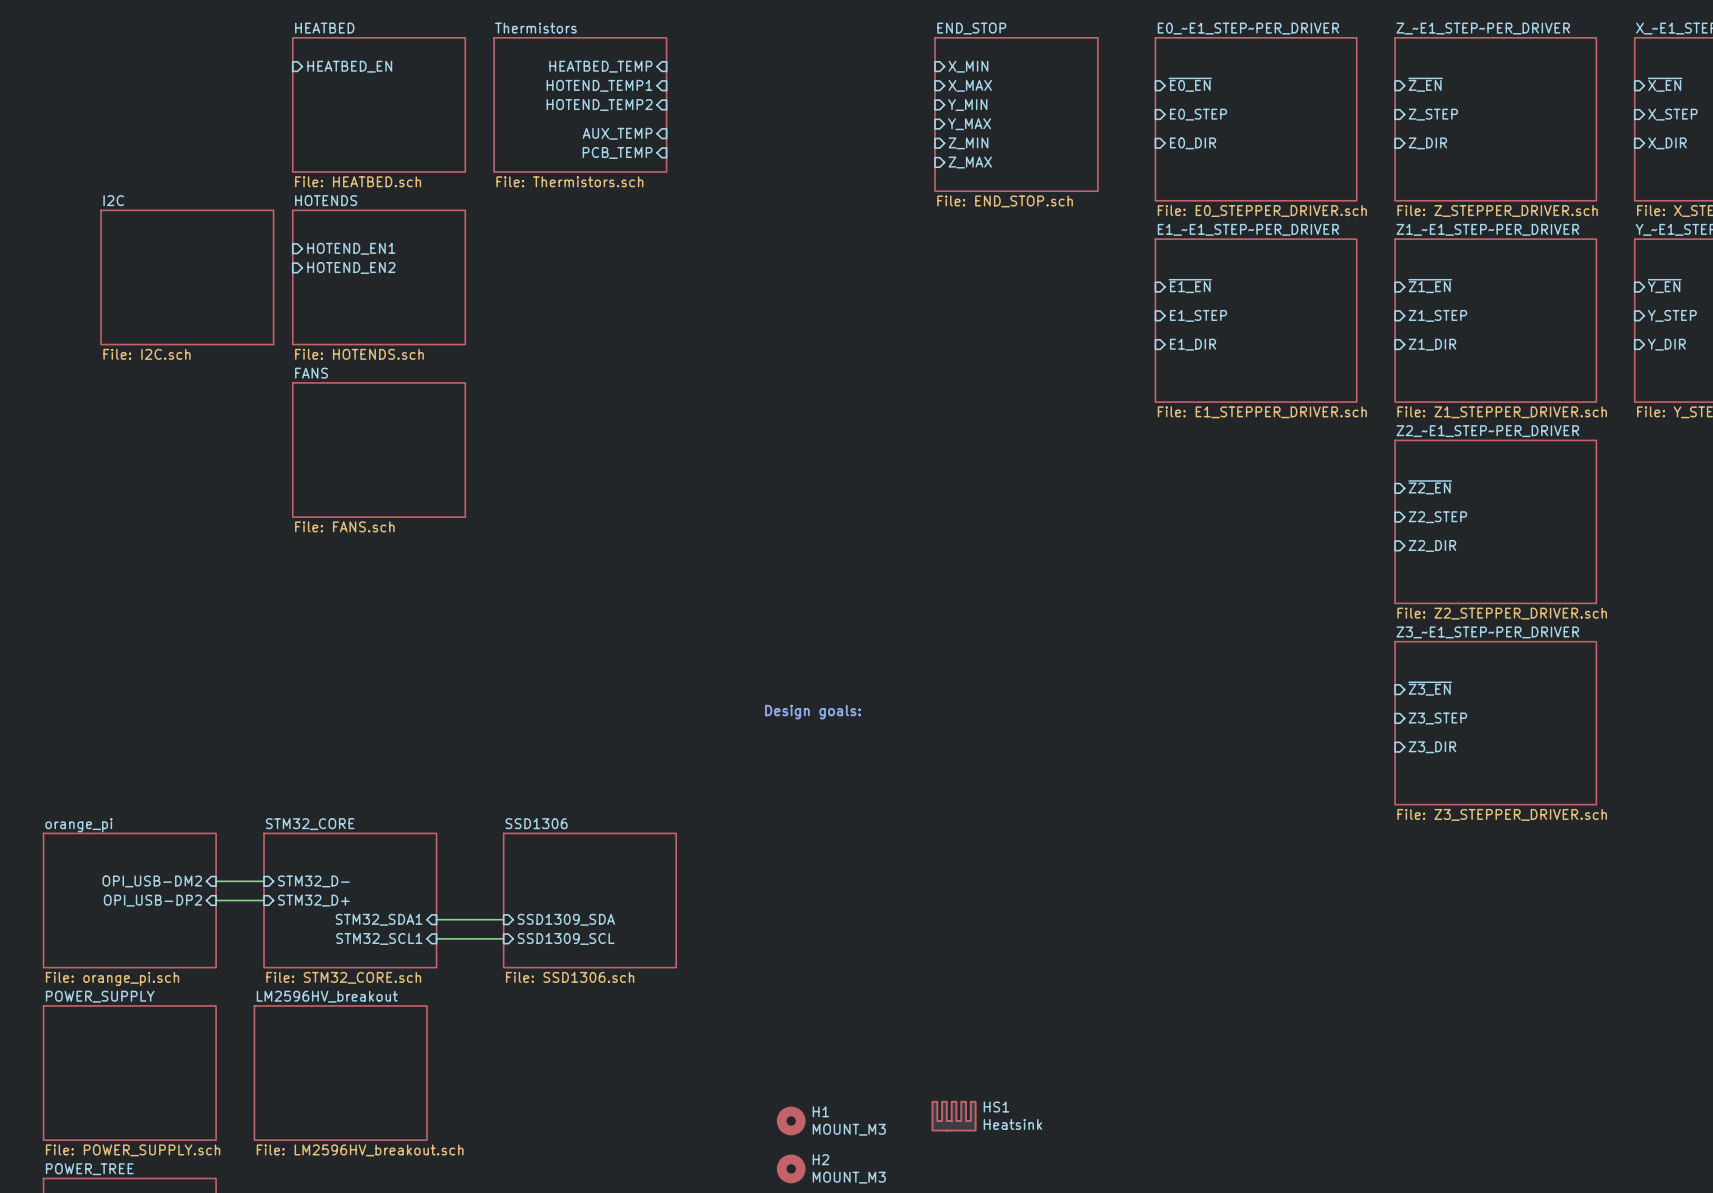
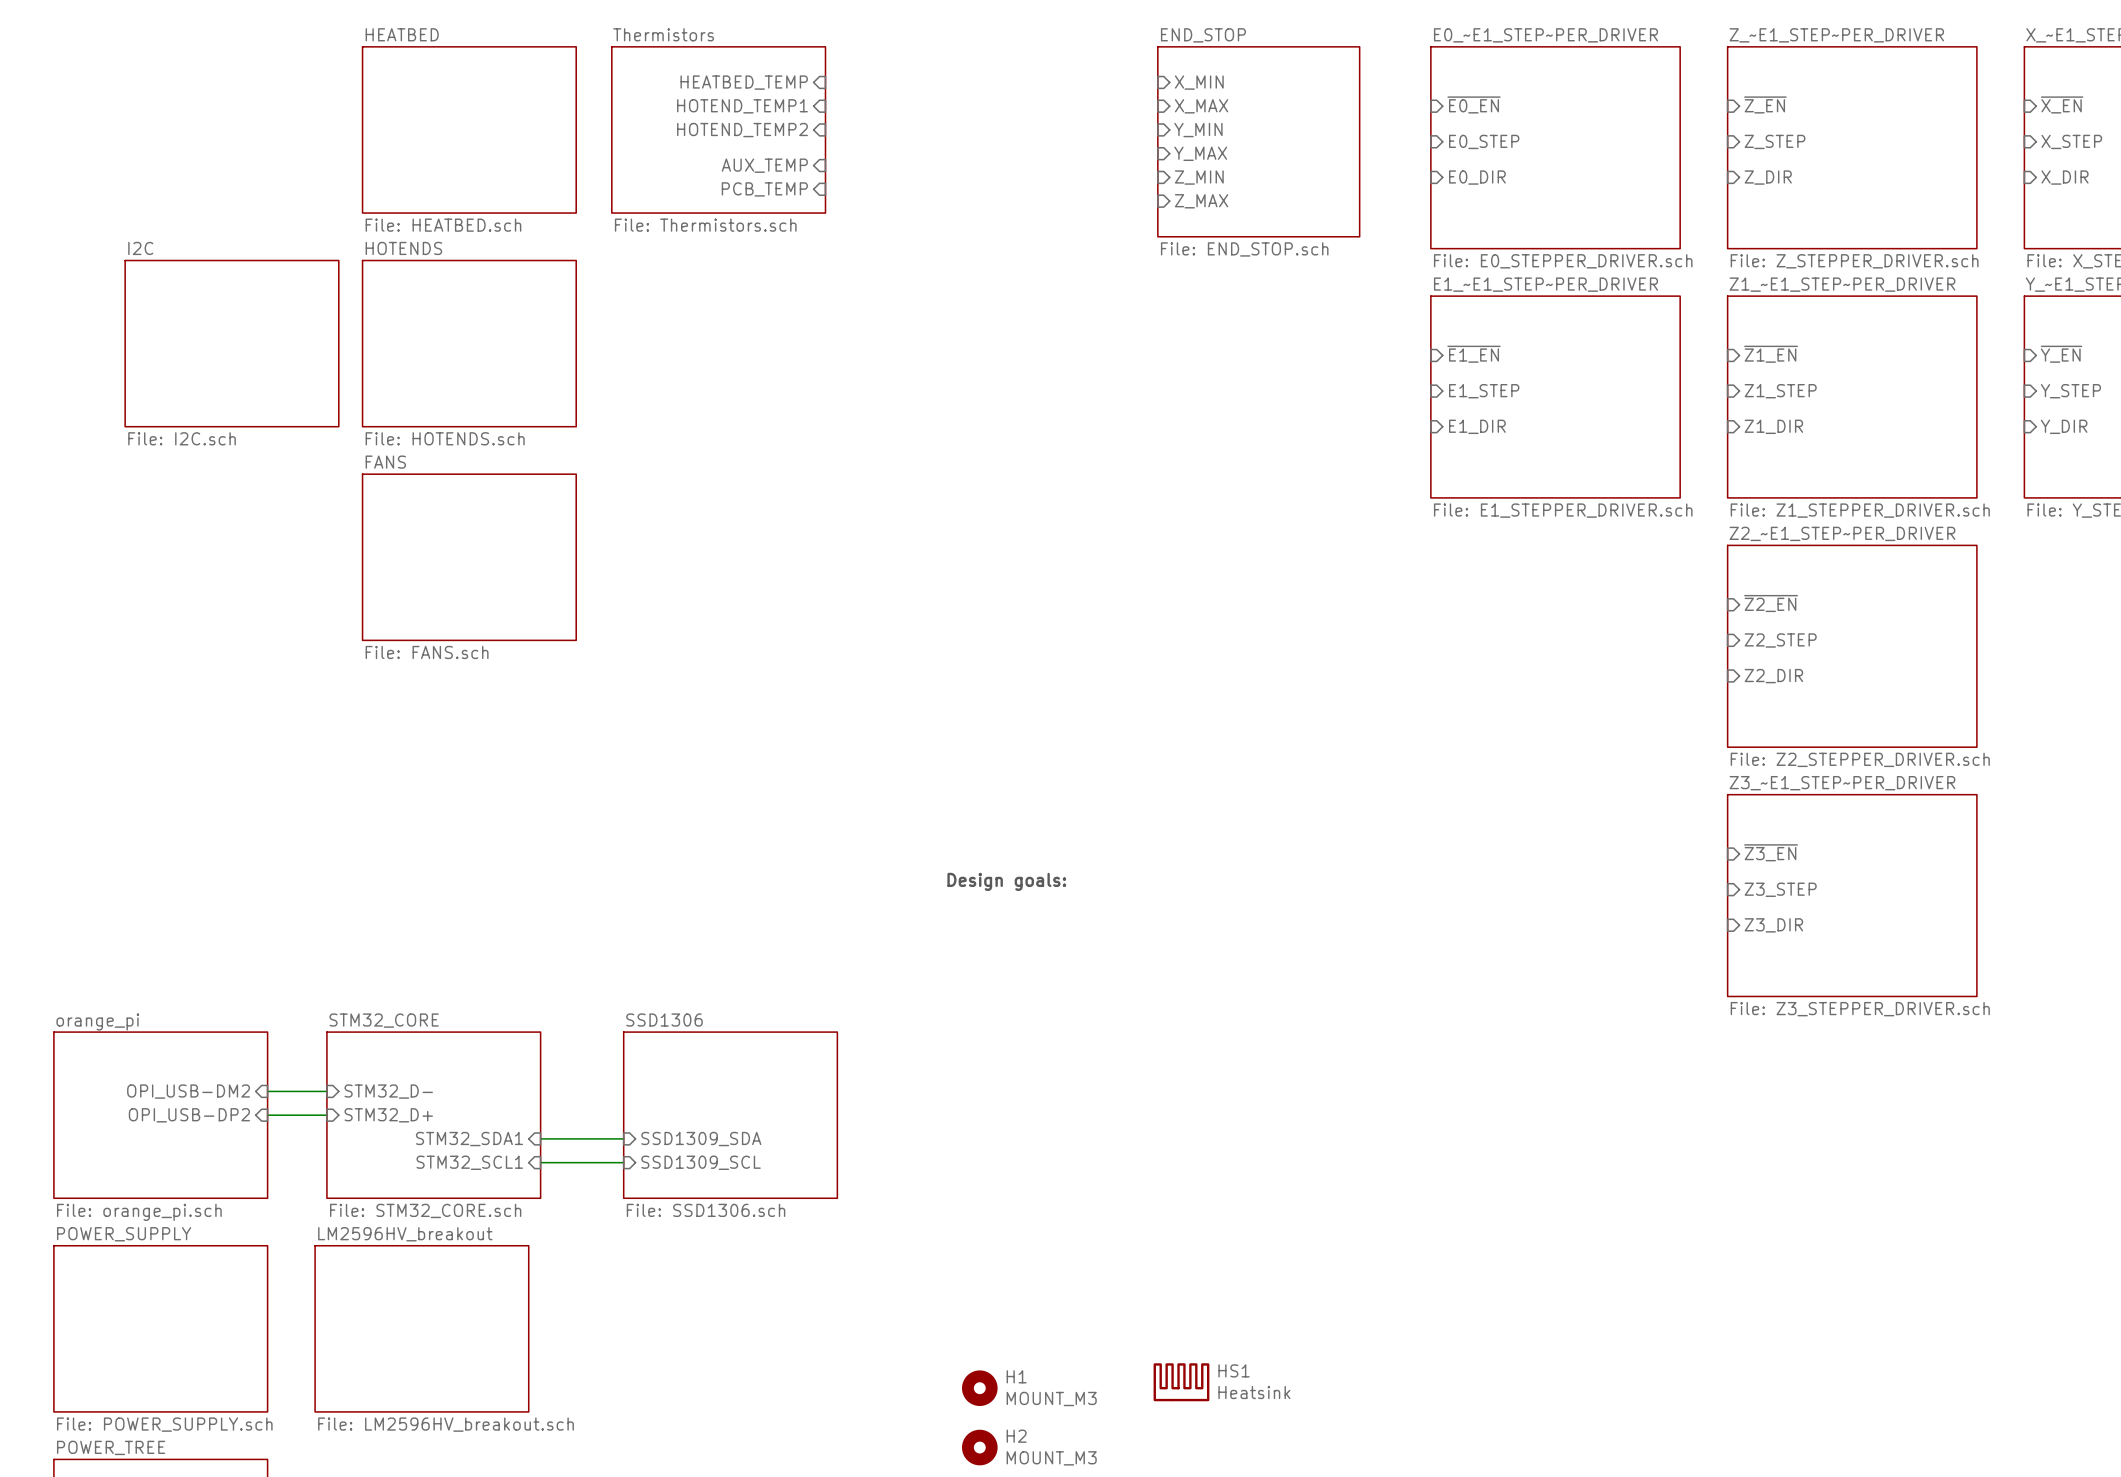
sheet pin: HEATBED_EN (349, 66) -> none
sheet pin: HOTEND_EN1 (351, 248) -> none
sheet pin: HOTEND_EN2 (351, 267) -> none

